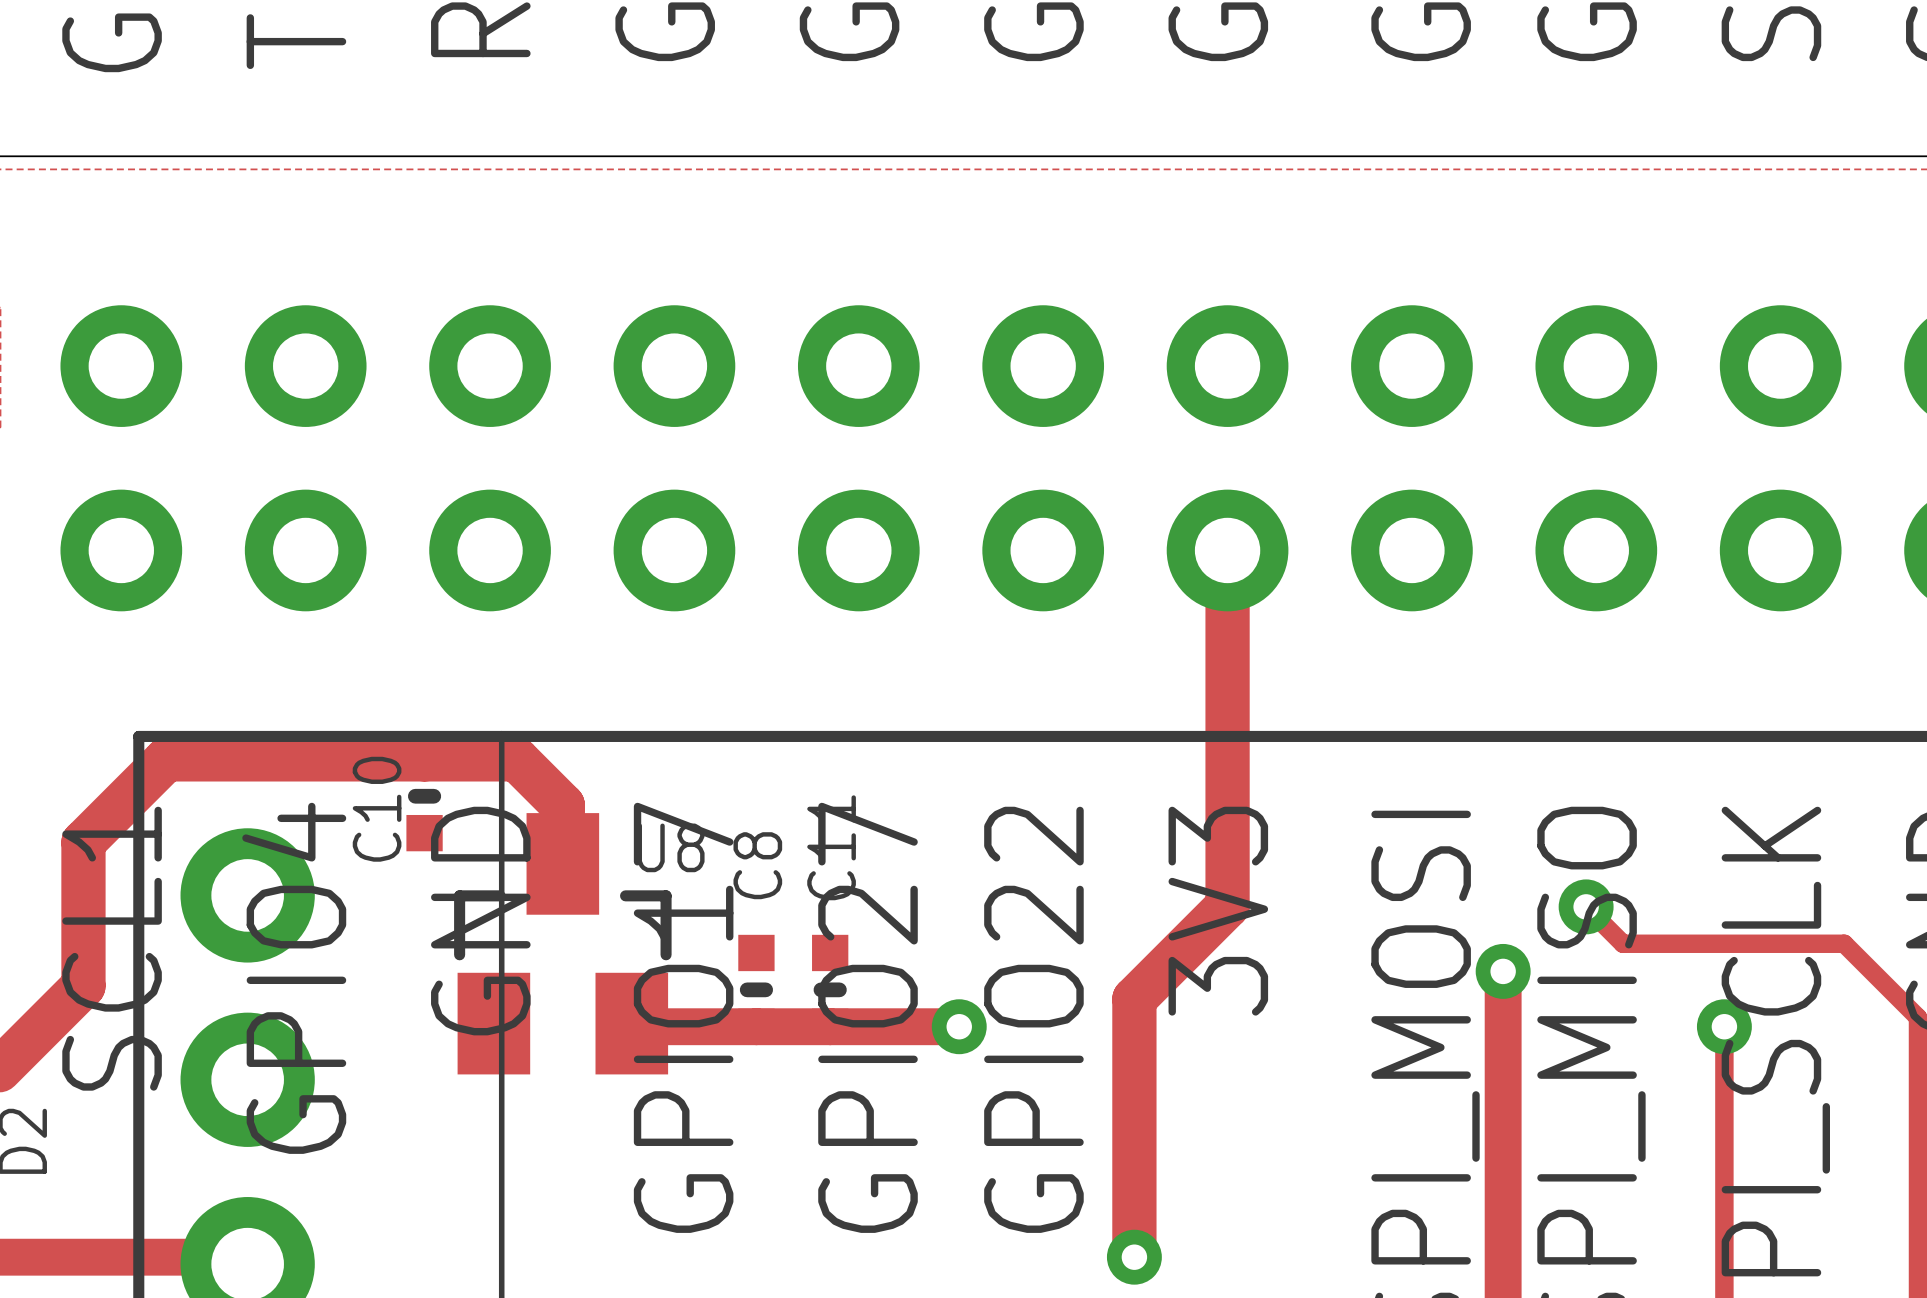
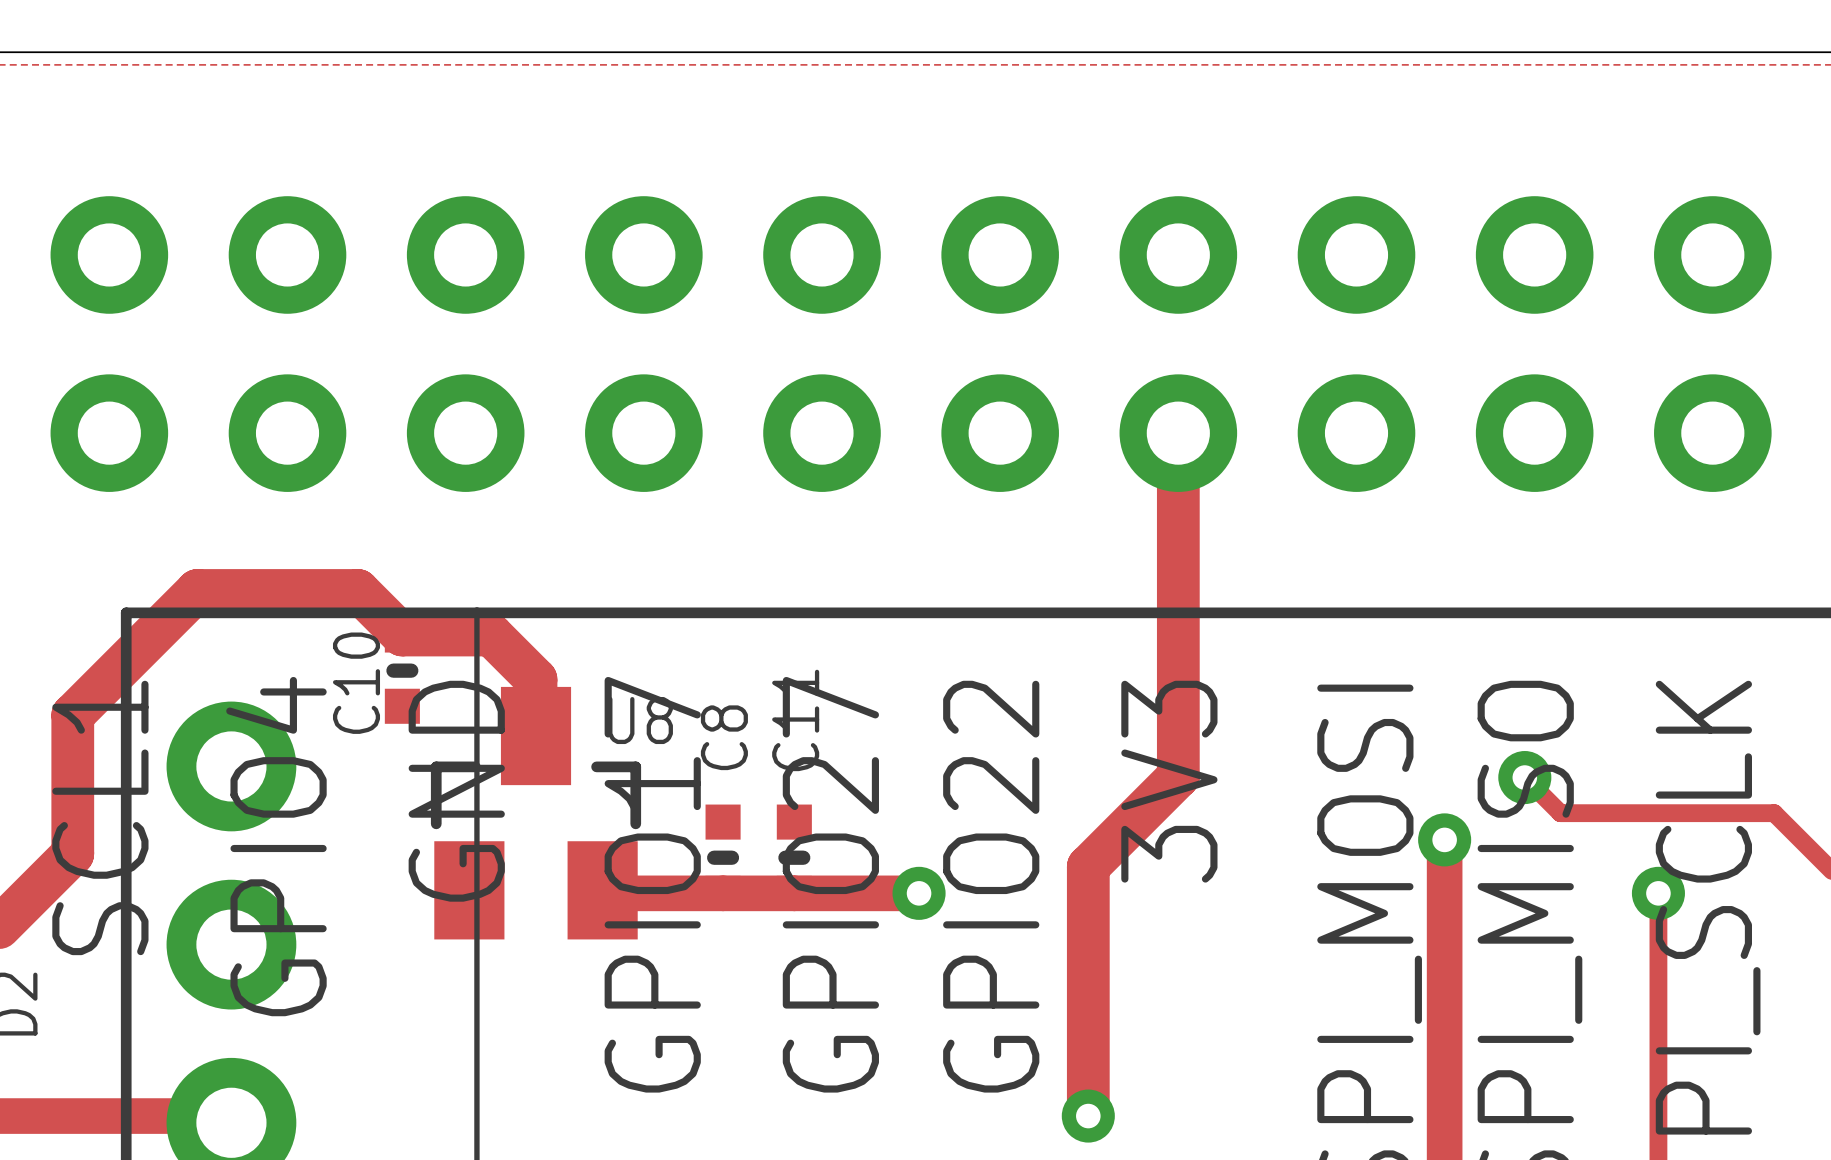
track: (166, 759) (424, 759) -> (152, 635) (197, 590) (357, 590) (402, 635)

